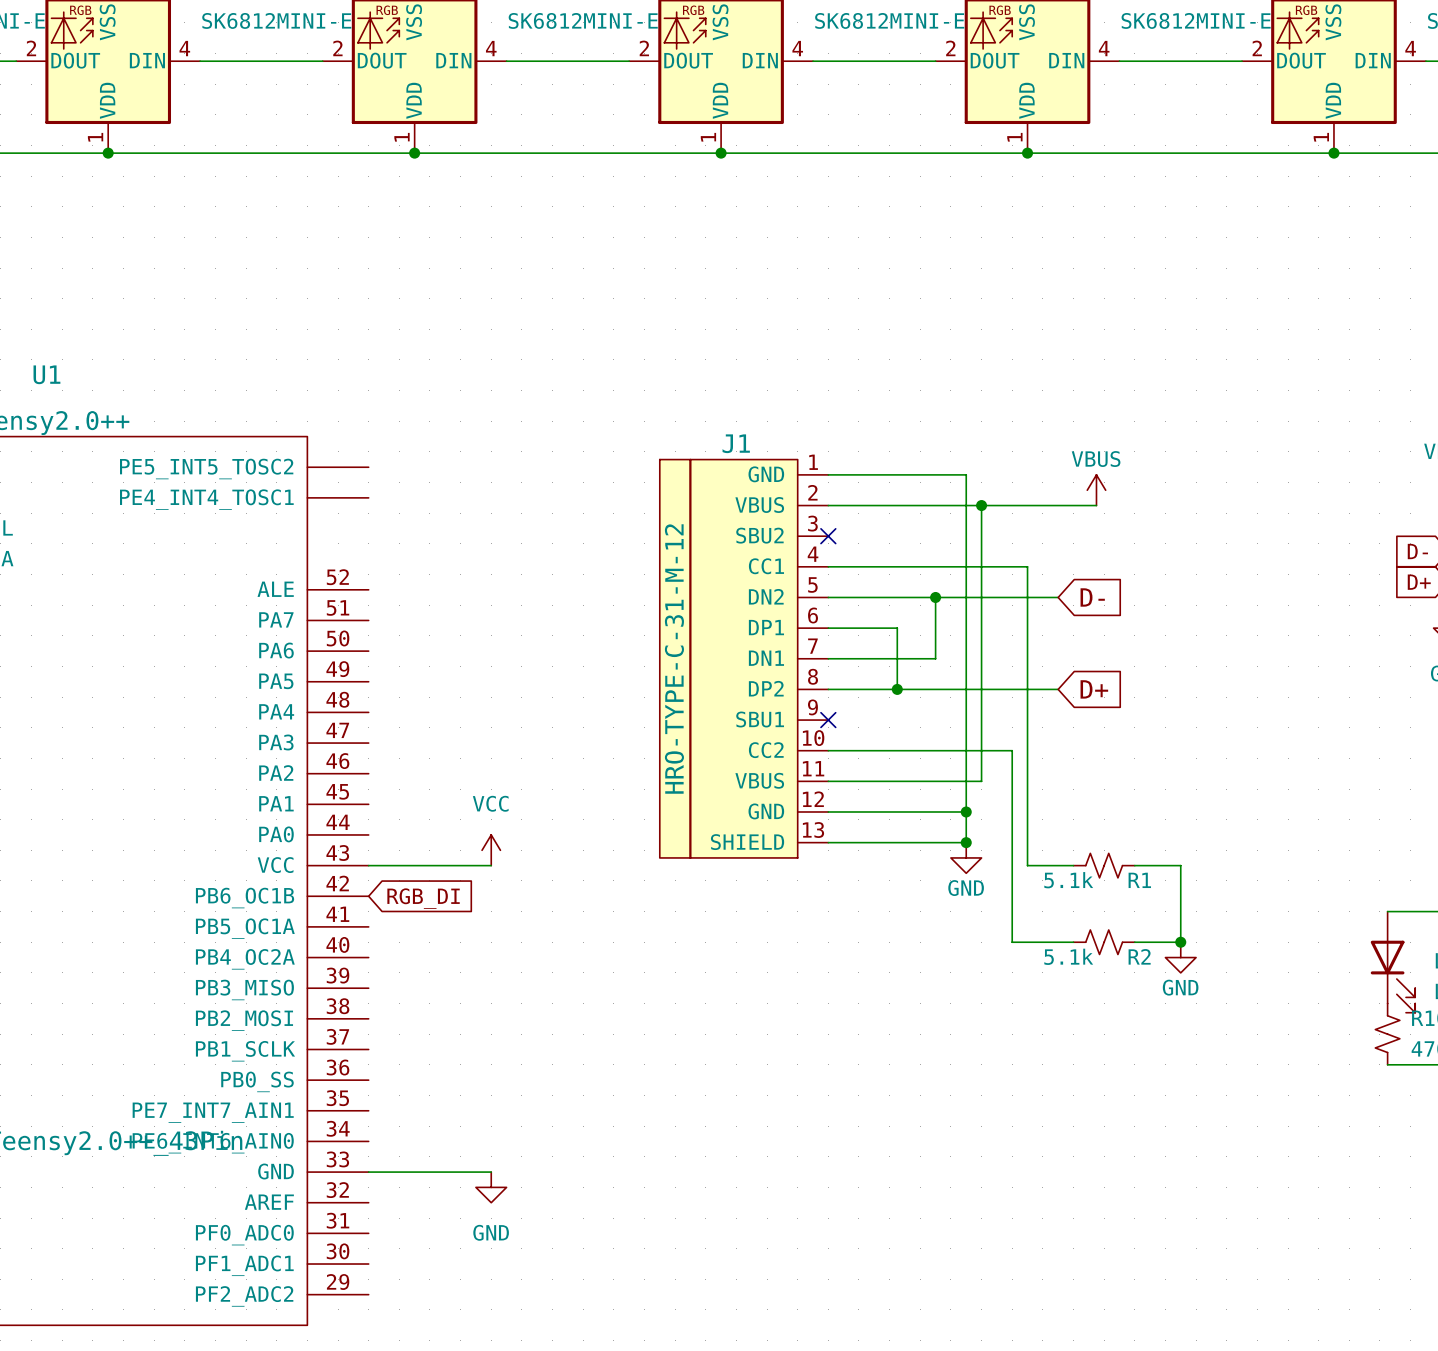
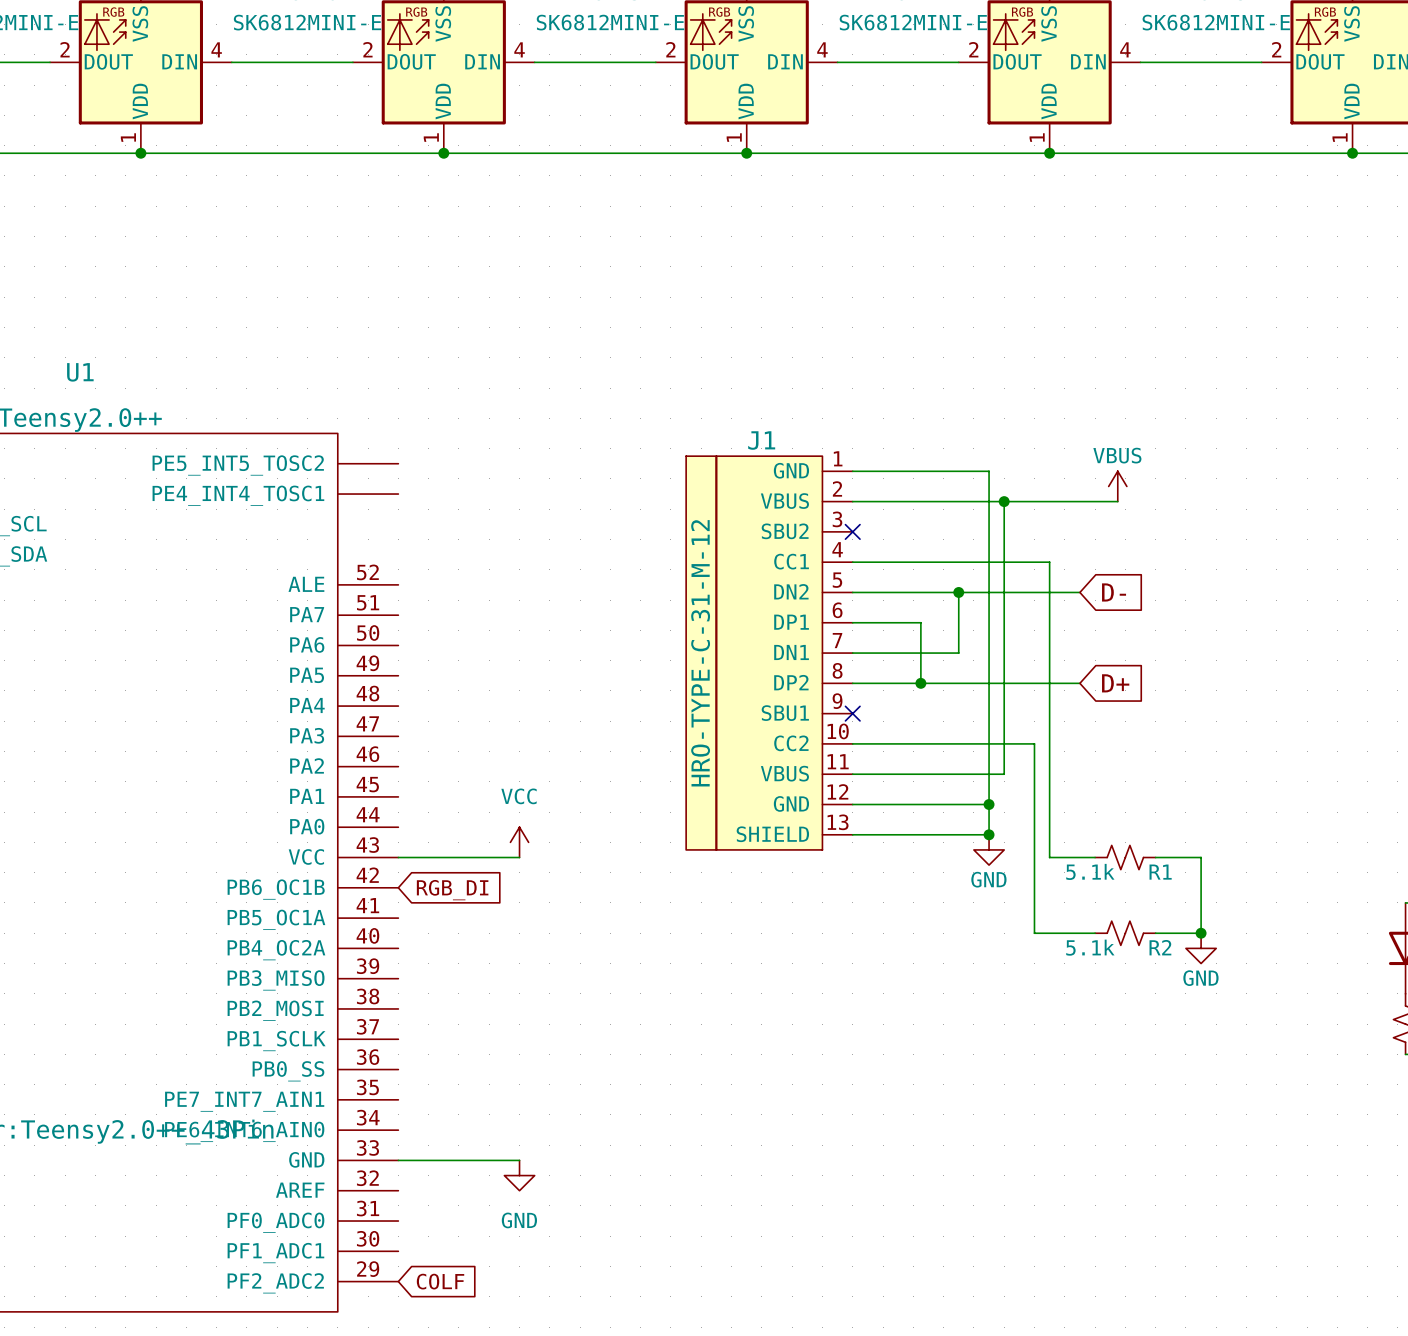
global label: none -> COLF (440, 1281)

